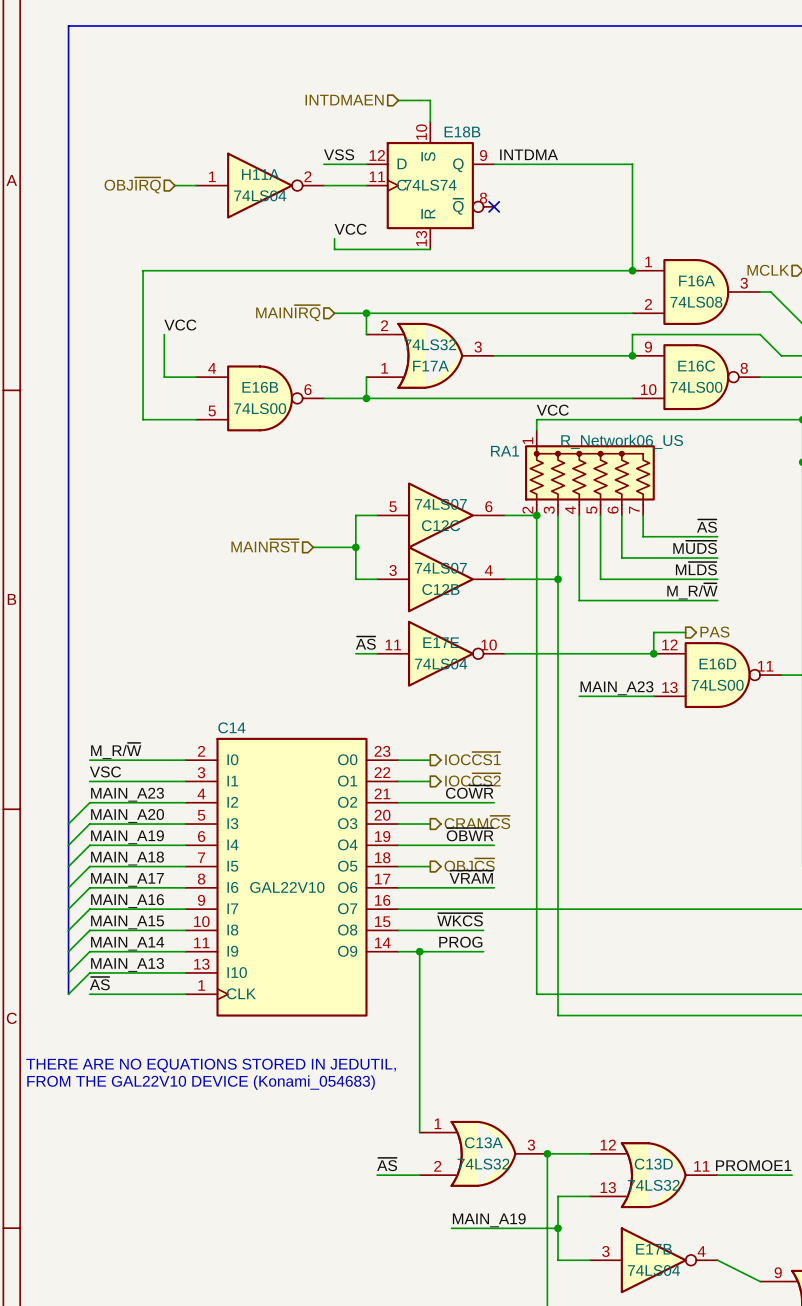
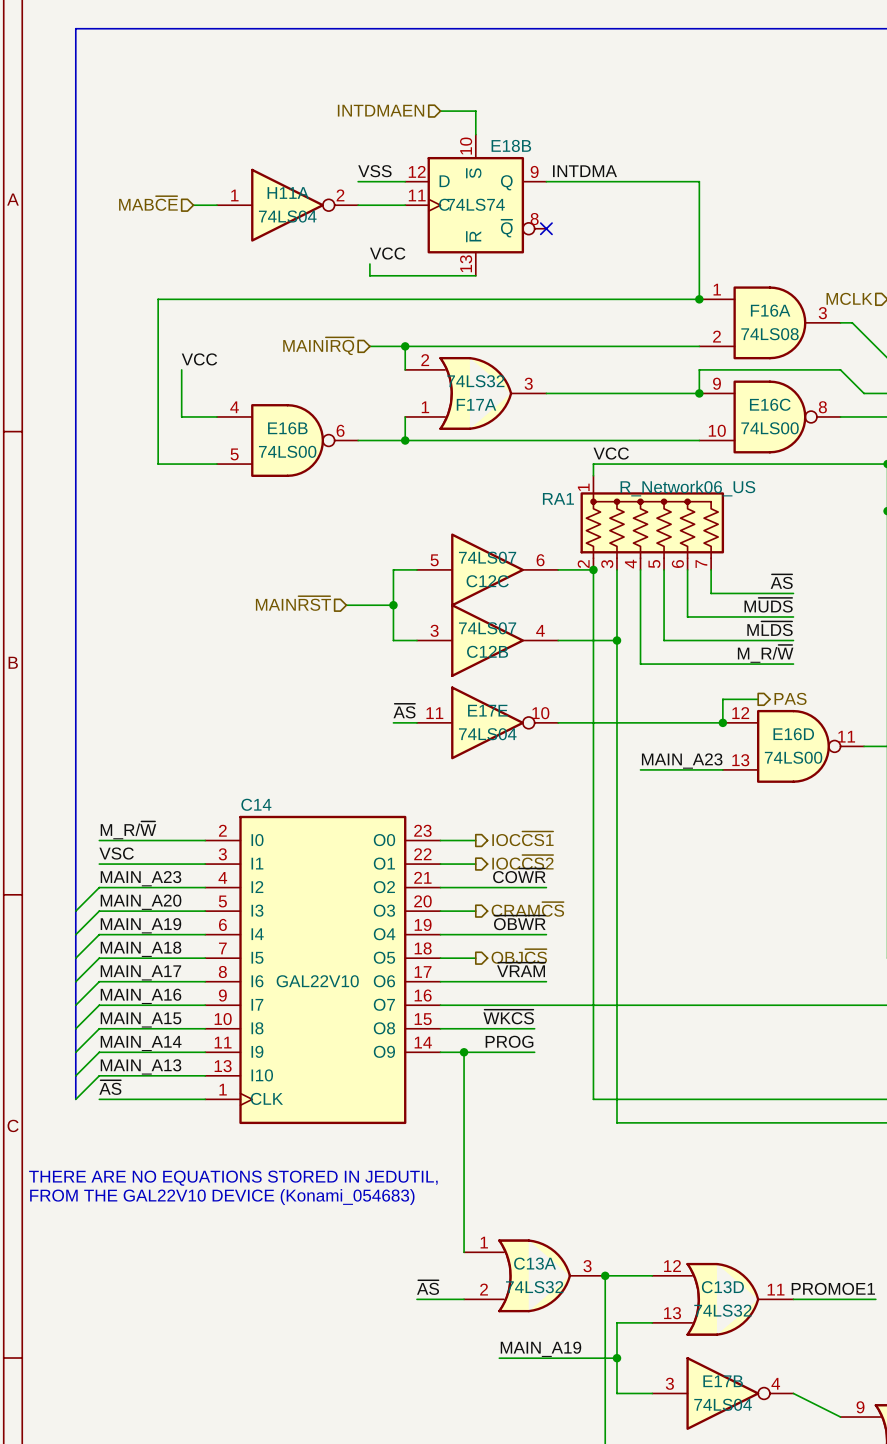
hierarchical label: OBJ~{IRQ} (132, 185) -> MAB~{CE} (148, 203)

